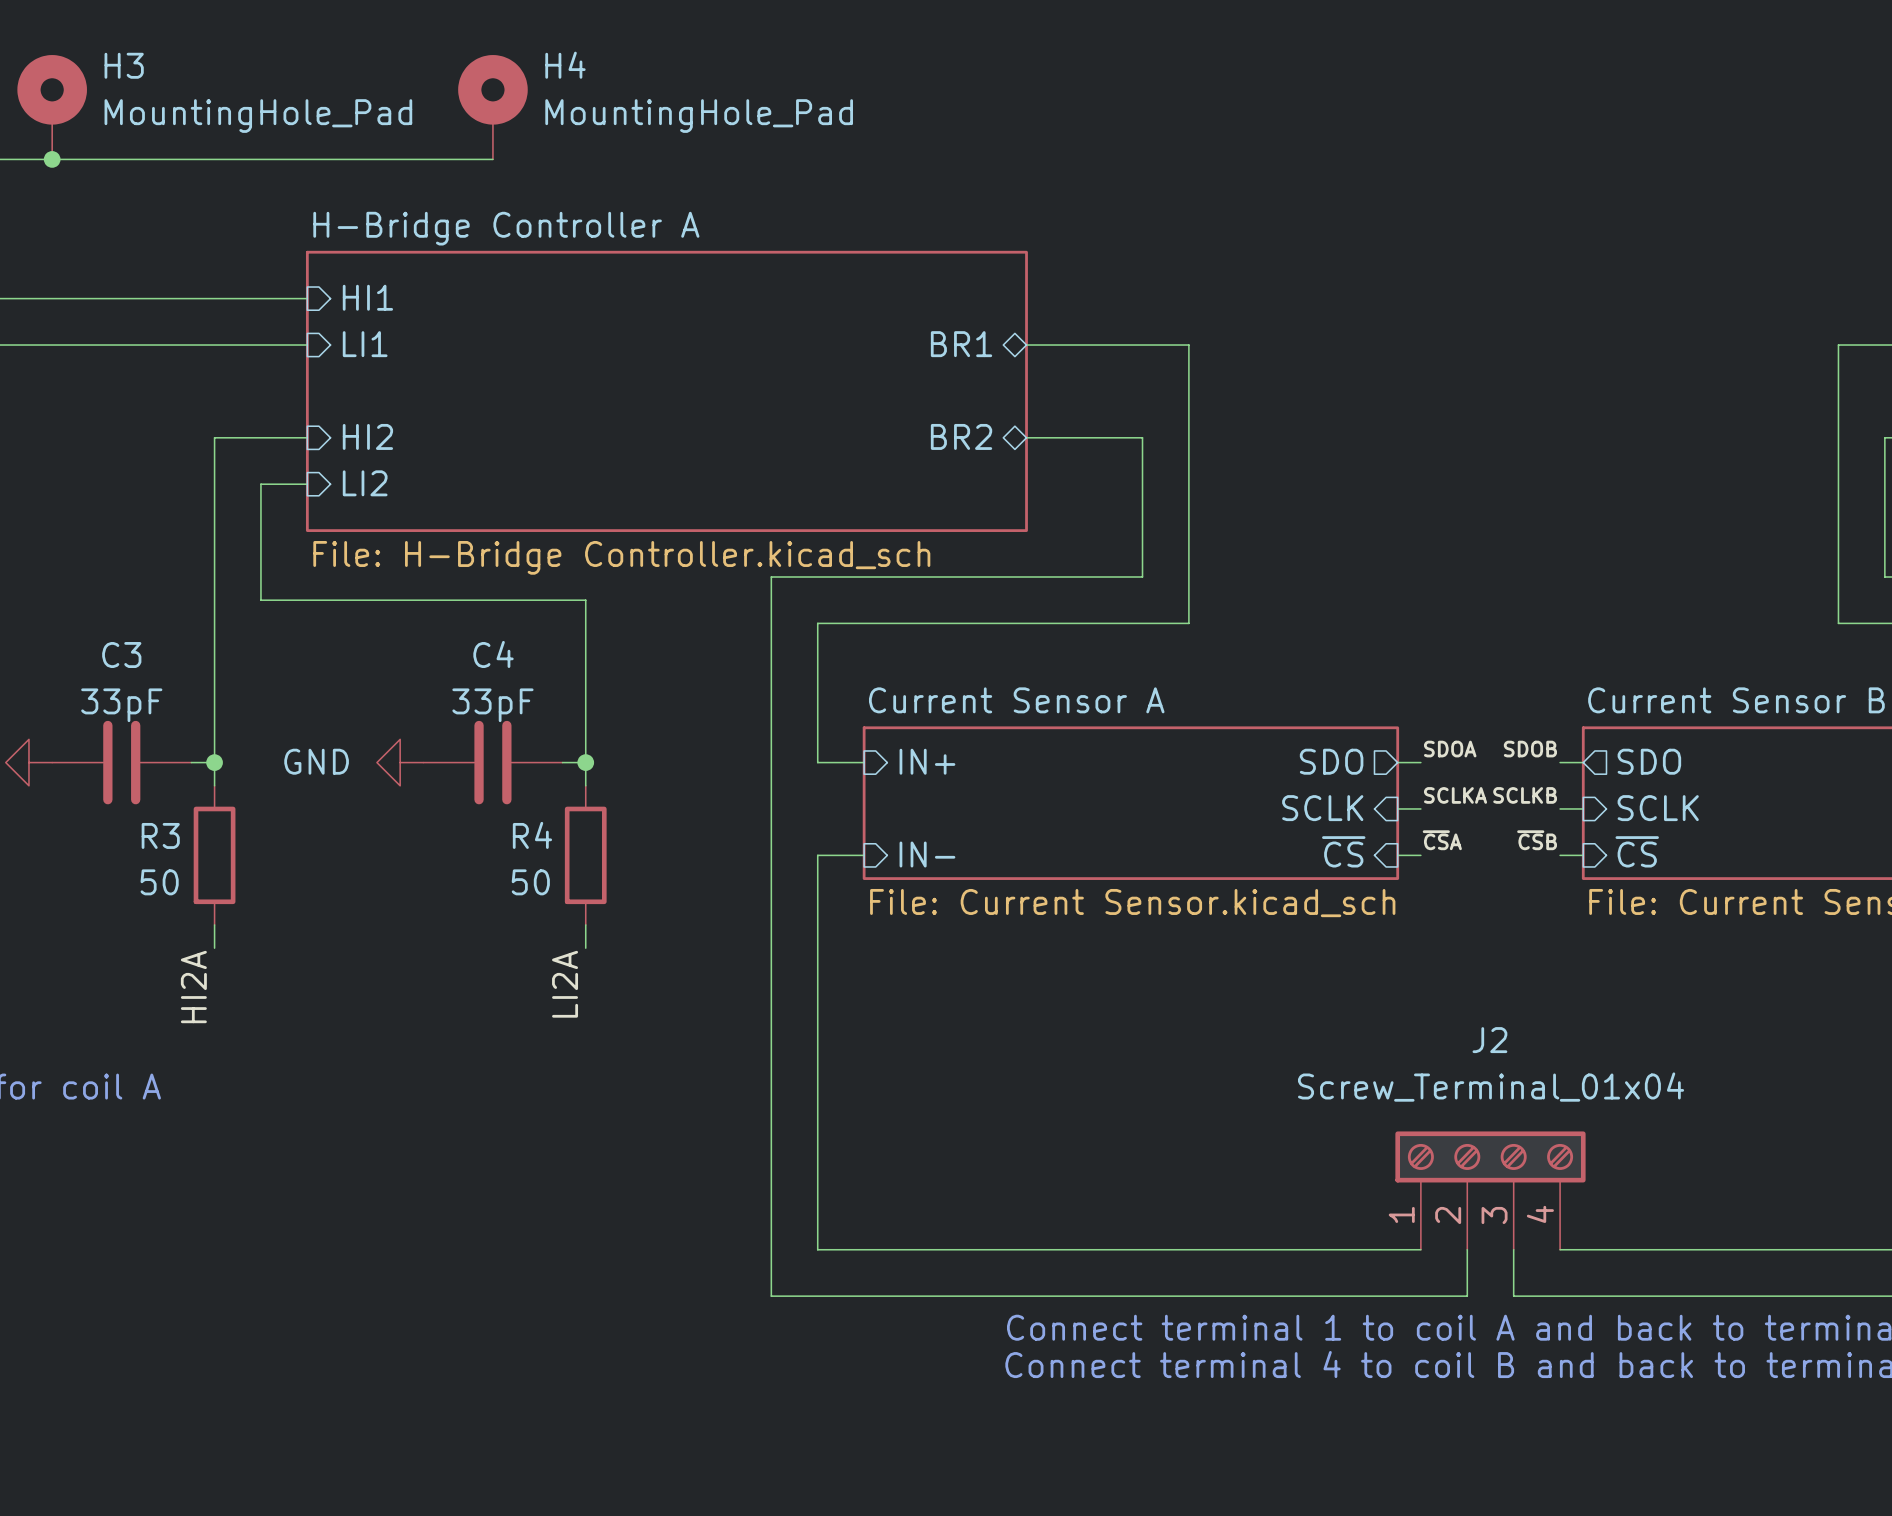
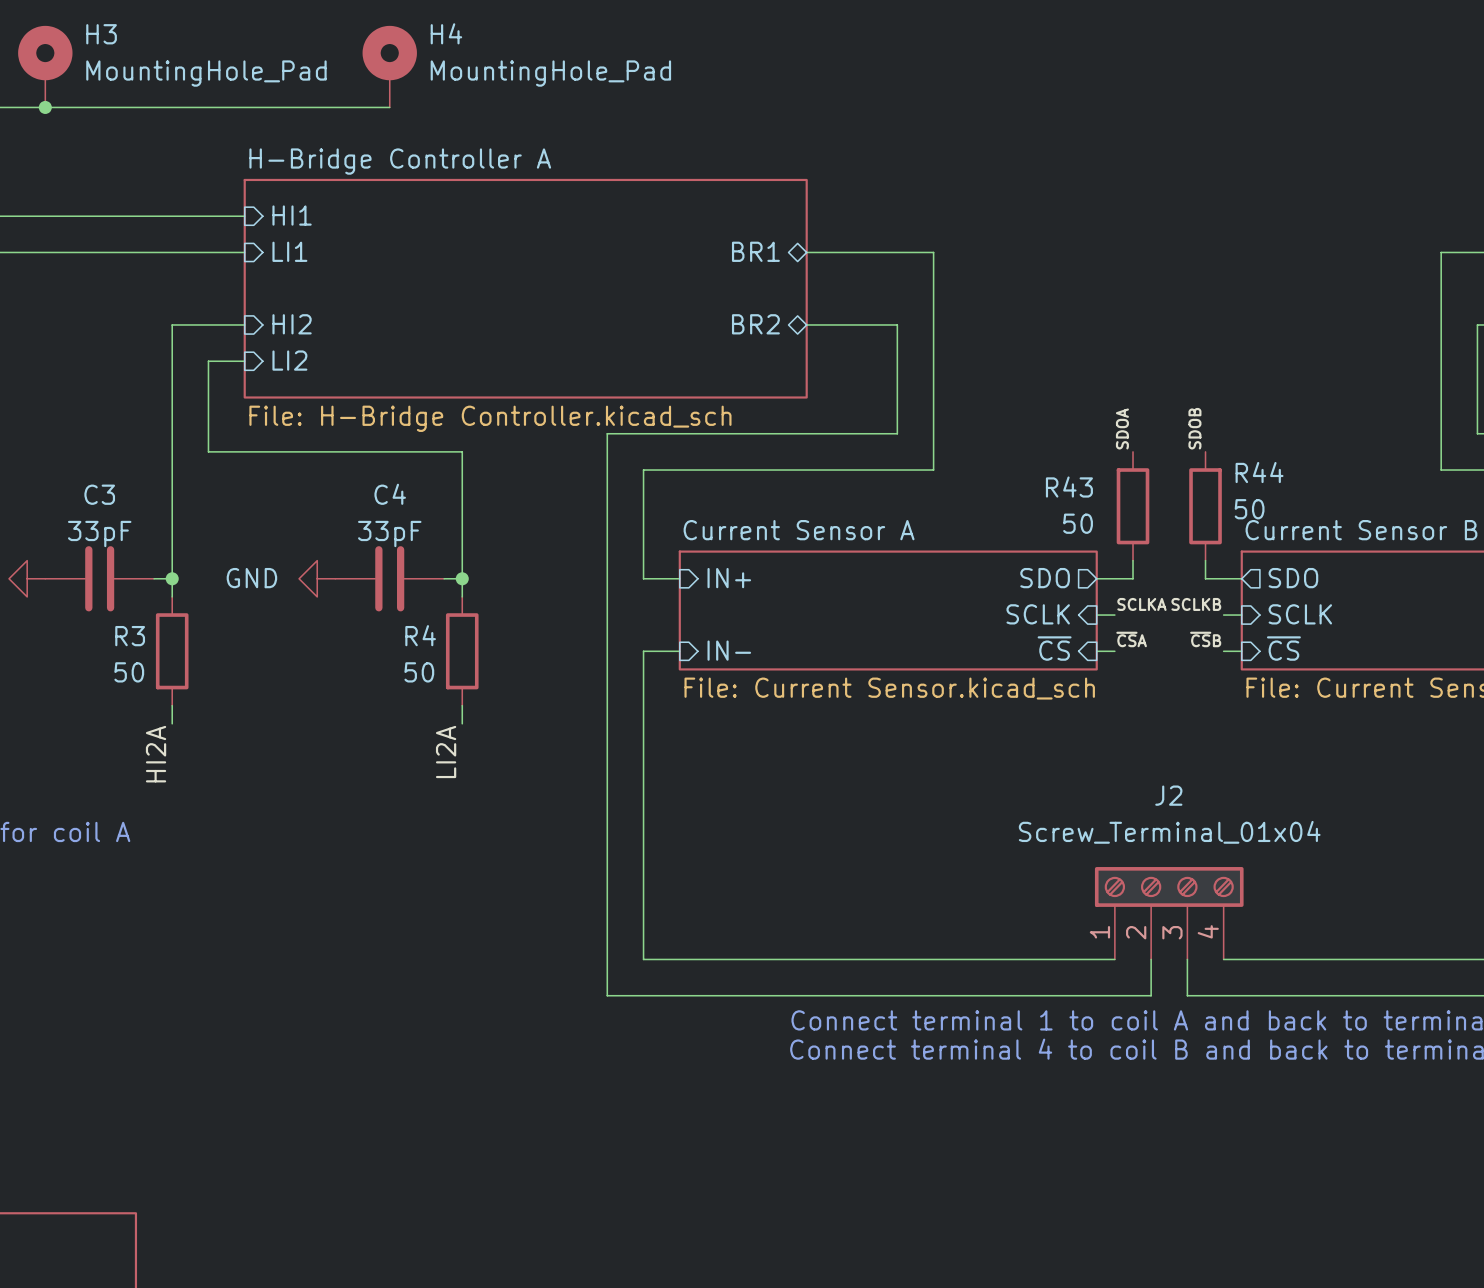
R43: none -> 50 (1133, 506)
R44: none -> 50 (1205, 506)
wire: none -> (1133, 560) (1133, 578) (1114, 578)
wire: none -> (1205, 560) (1205, 578) (1223, 578)
label rotation: 0° (1450, 749) -> 90° counterclockwise (1122, 428)
label position: SDOA (1450, 749) -> SDOA (1122, 428)
label rotation: 0° (1530, 749) -> 90° counterclockwise (1194, 428)
label position: SDOB (1530, 749) -> SDOB (1194, 428)

